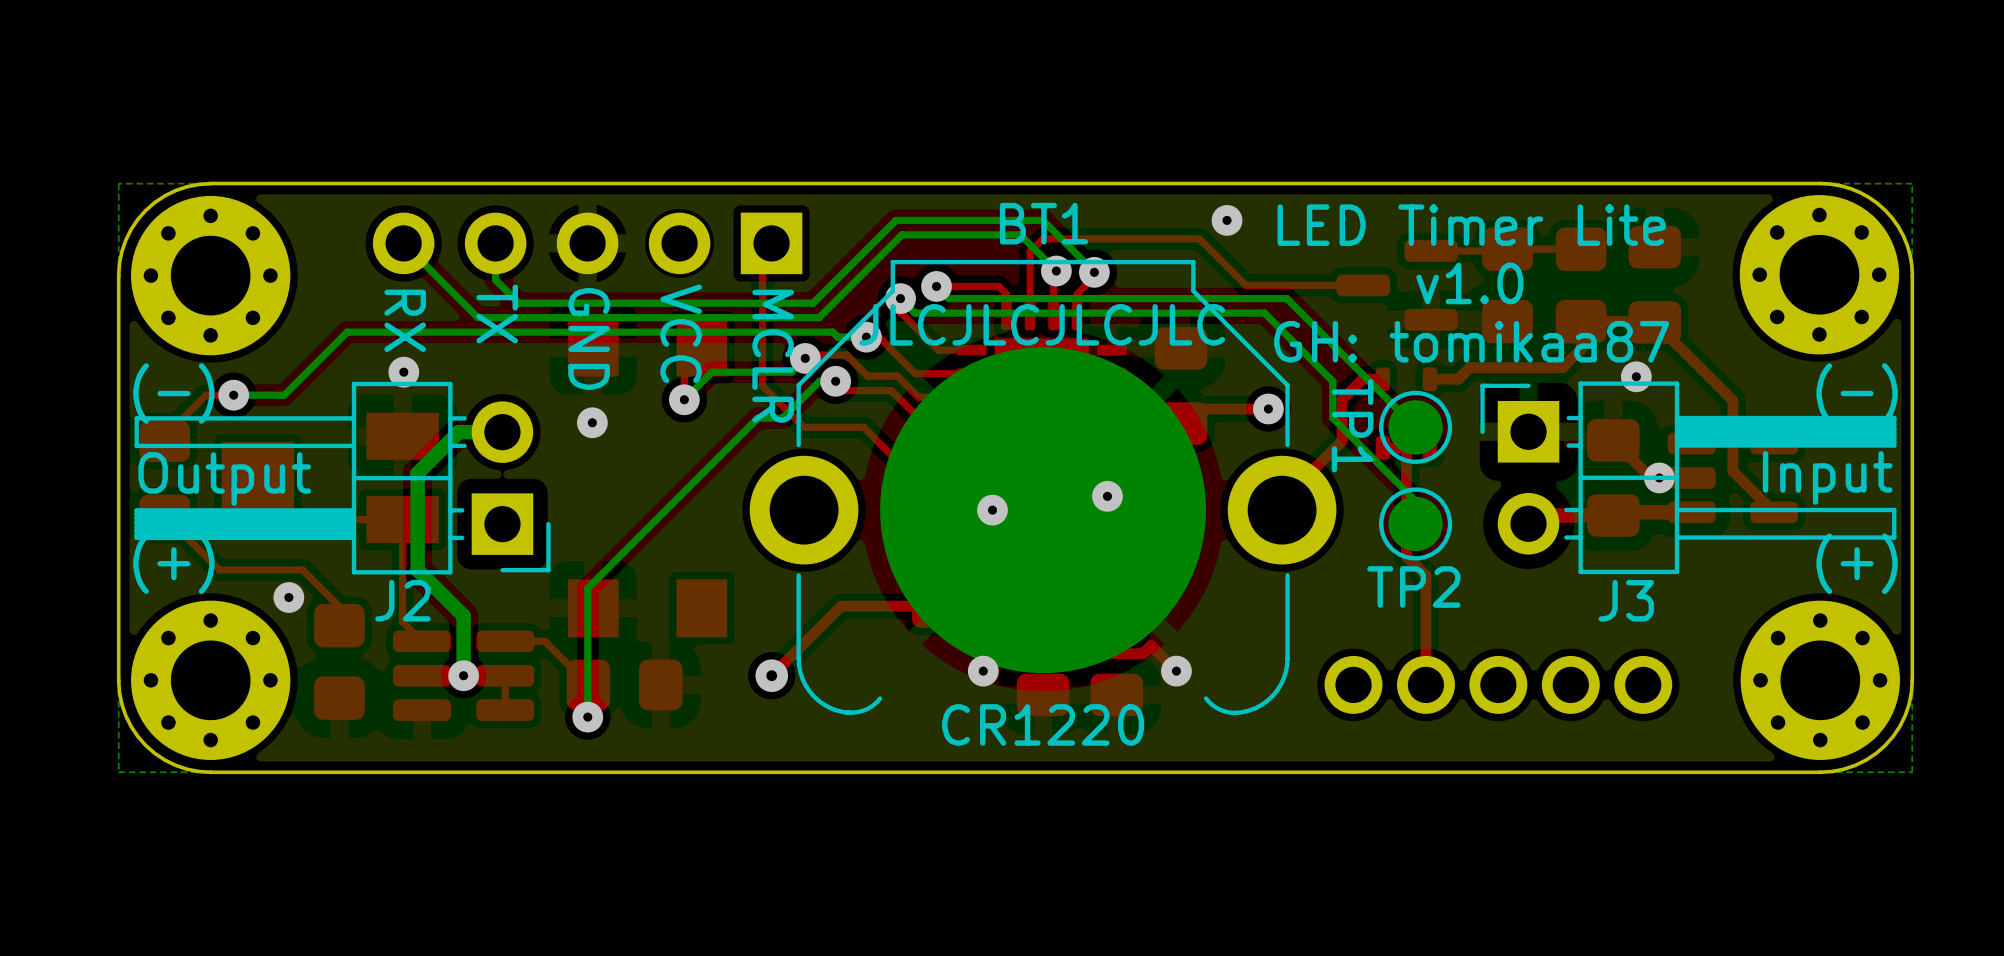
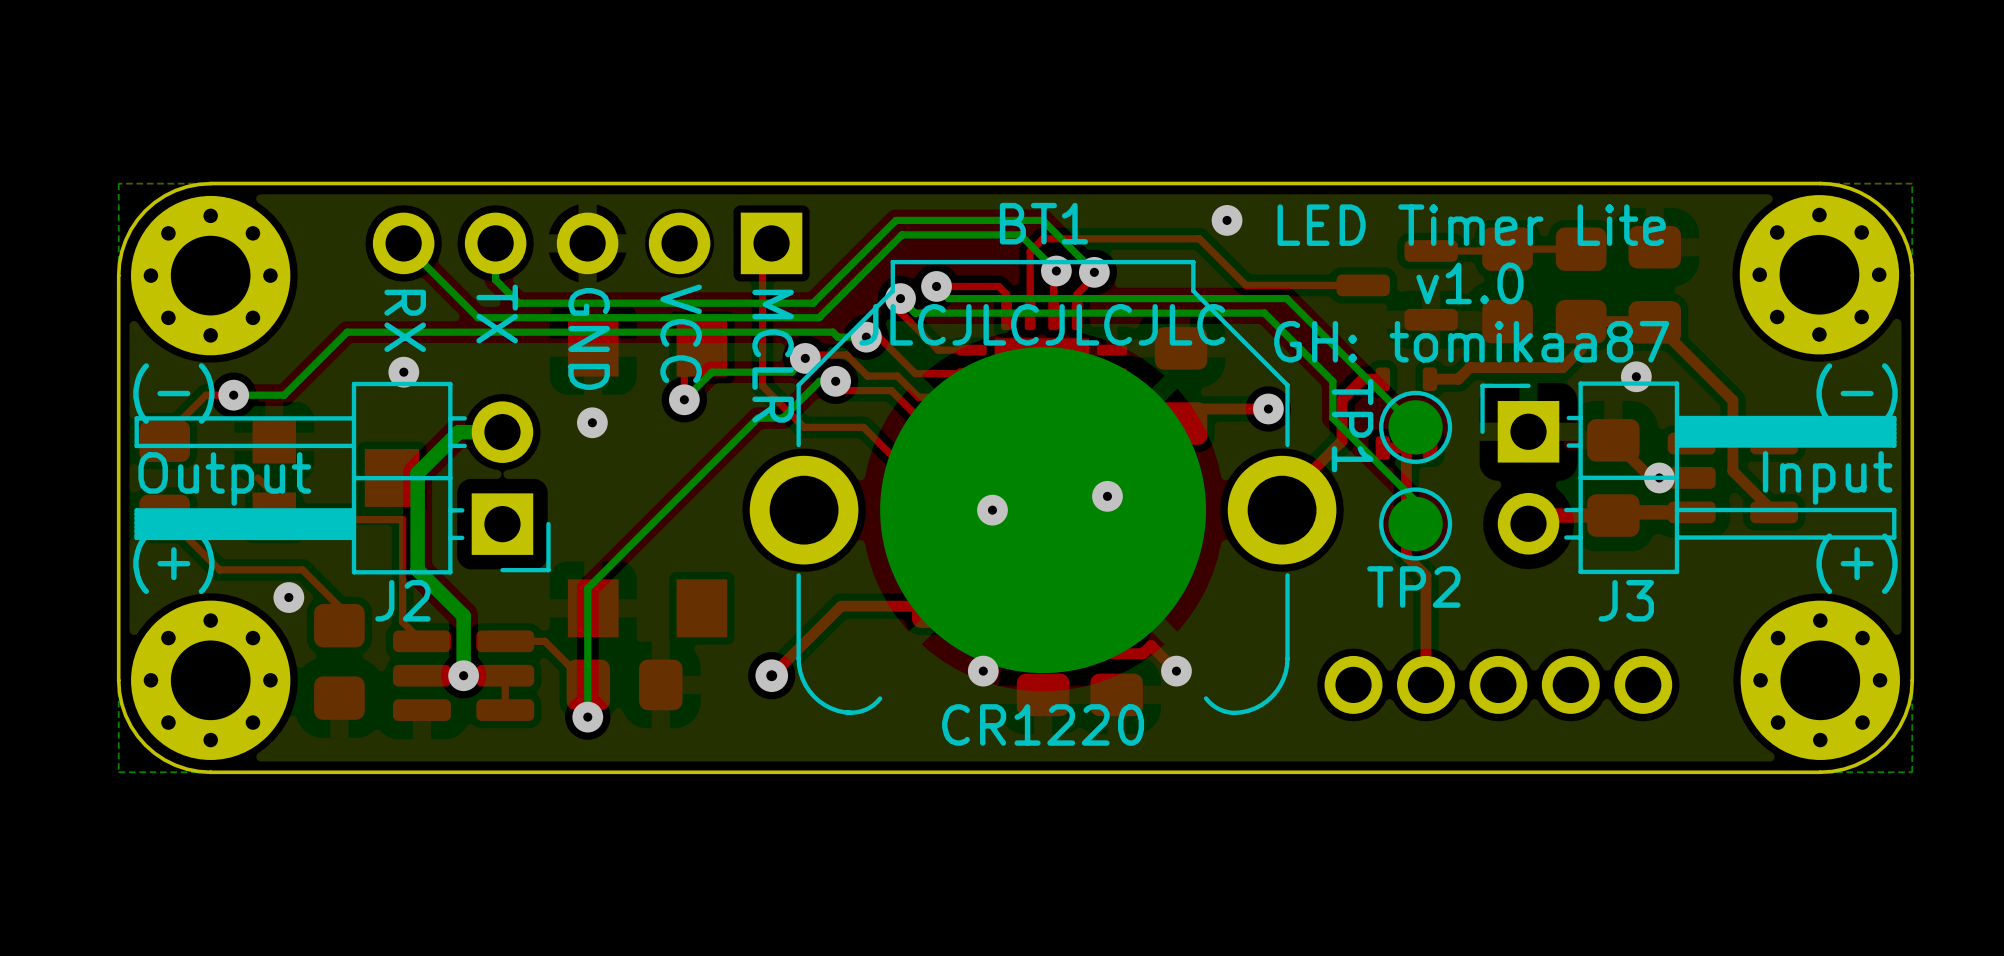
part footprint: [221, 412, 439, 544] -> [252, 420, 420, 536]

